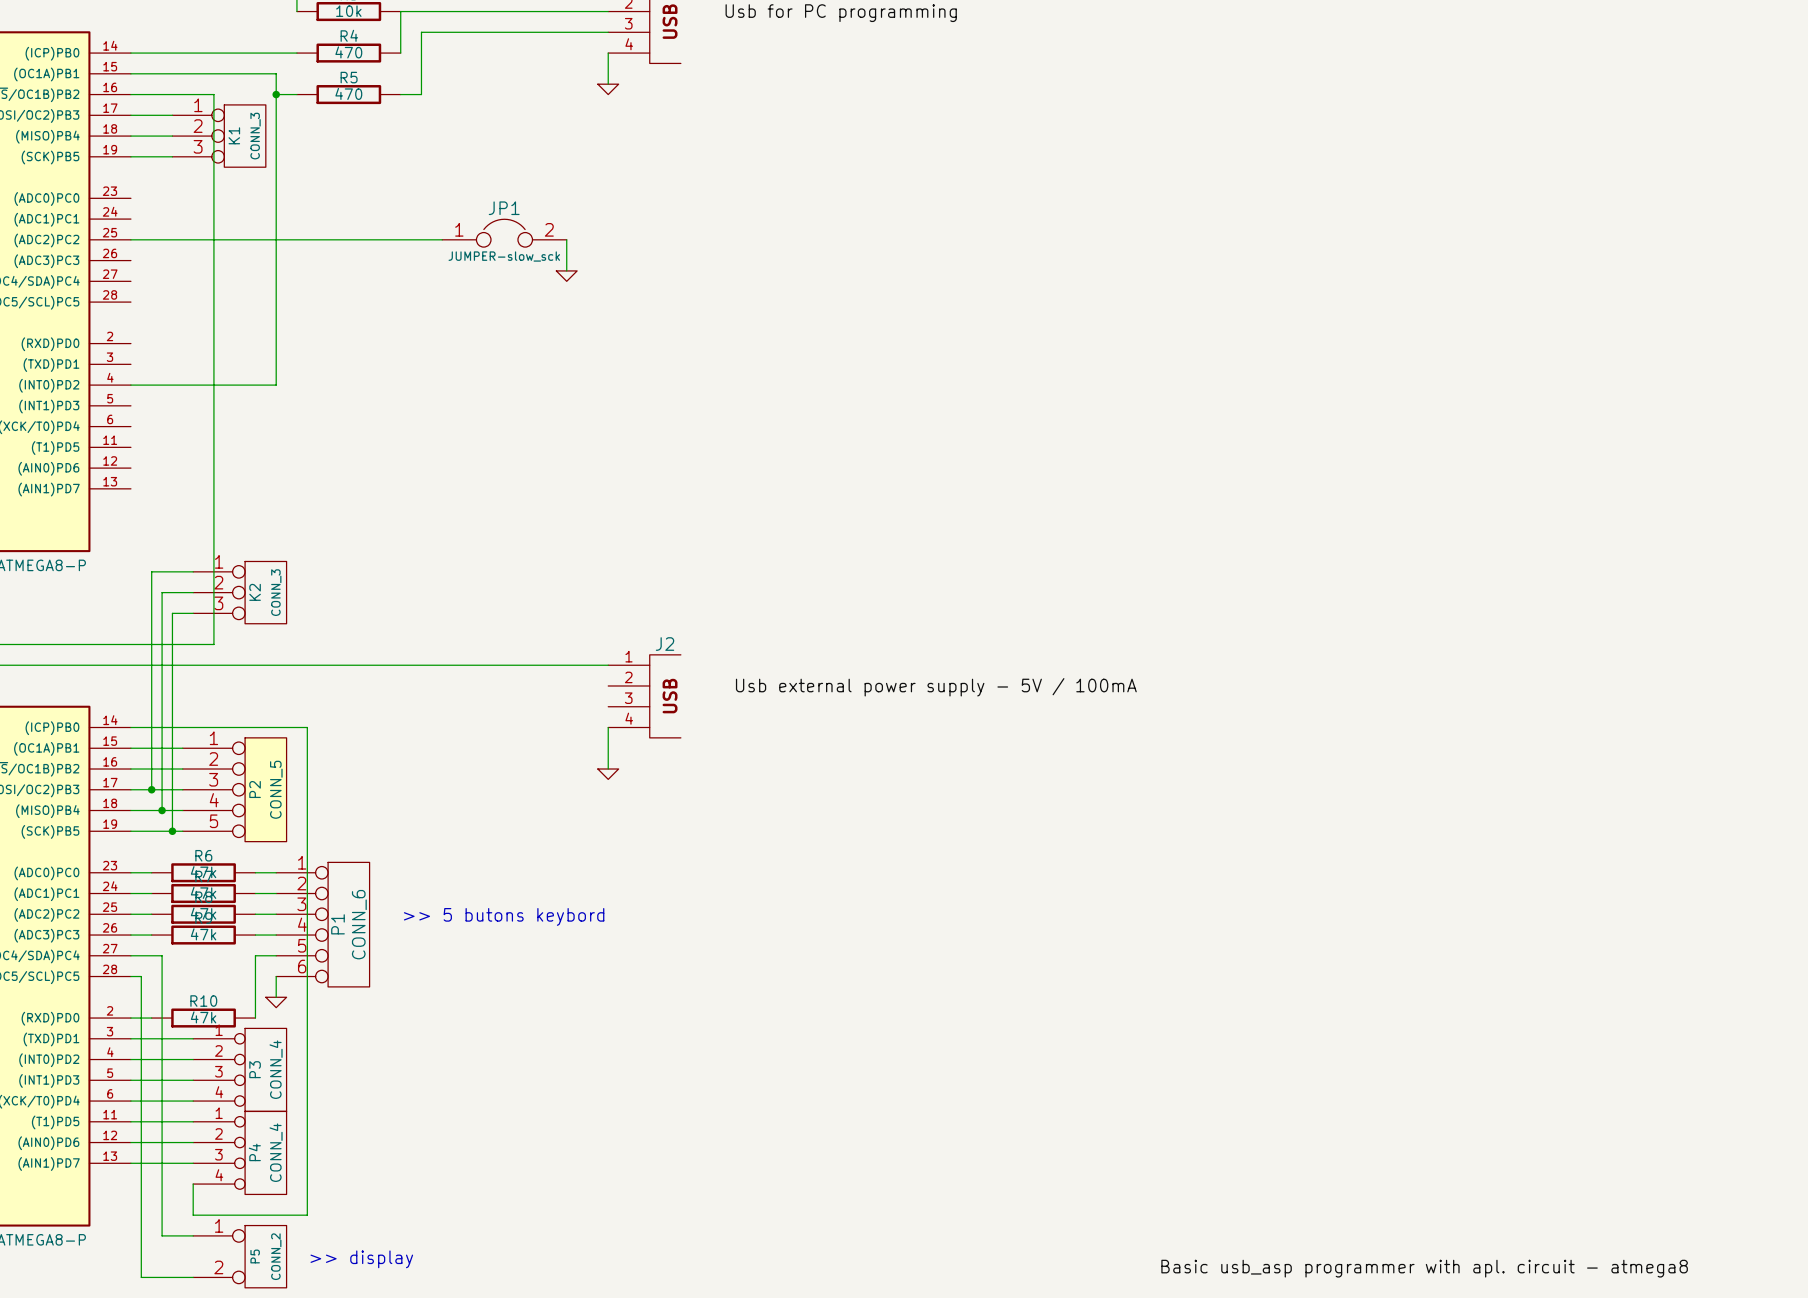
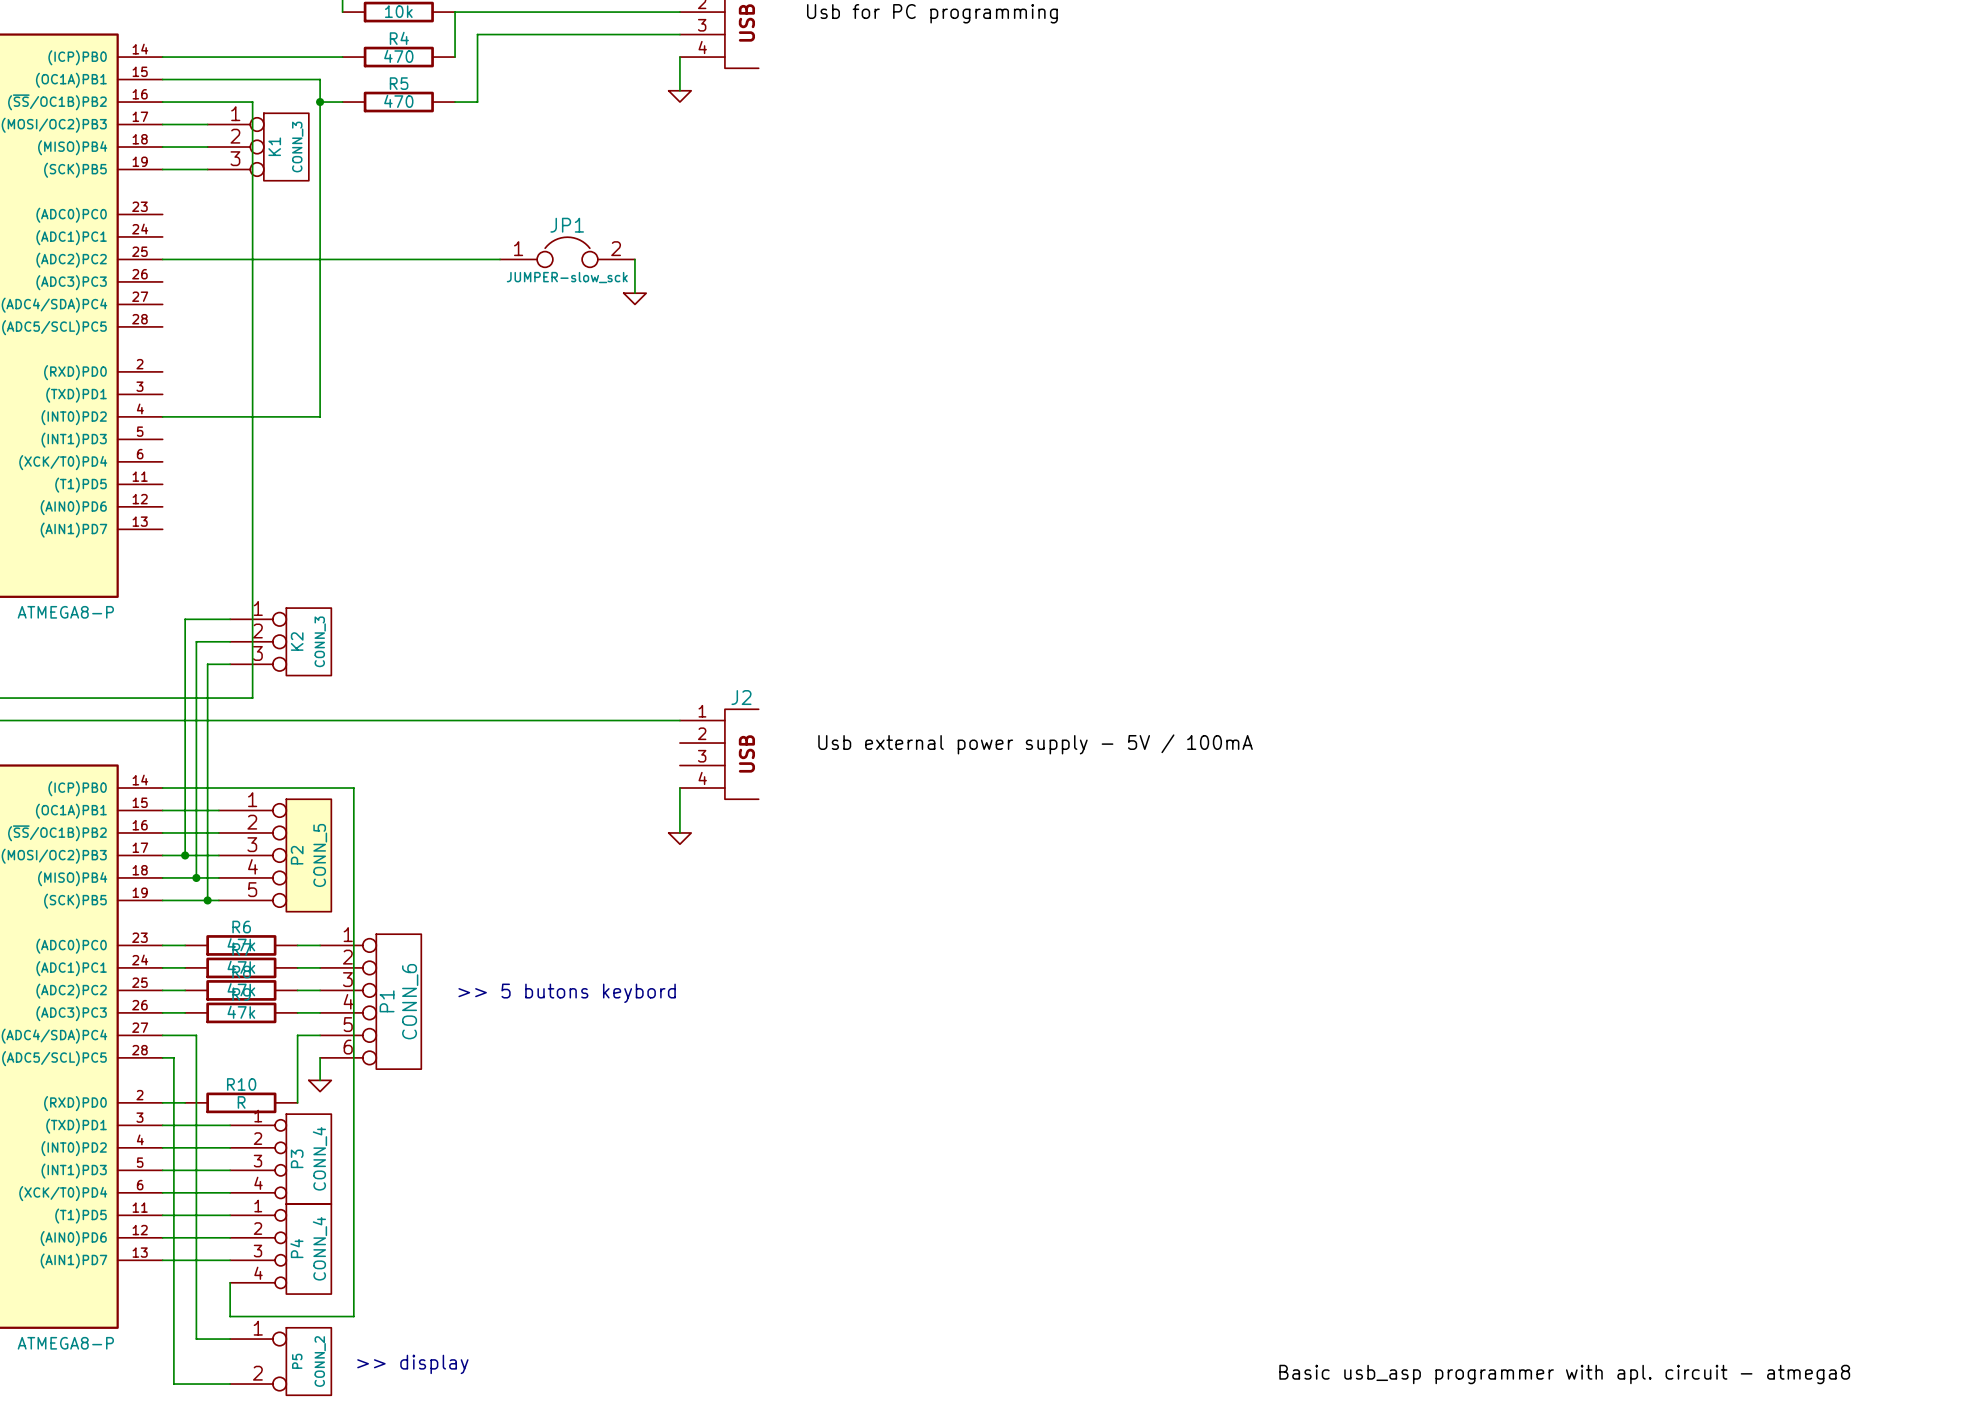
R10 value: 47k (203, 1017) -> R (241, 1102)

